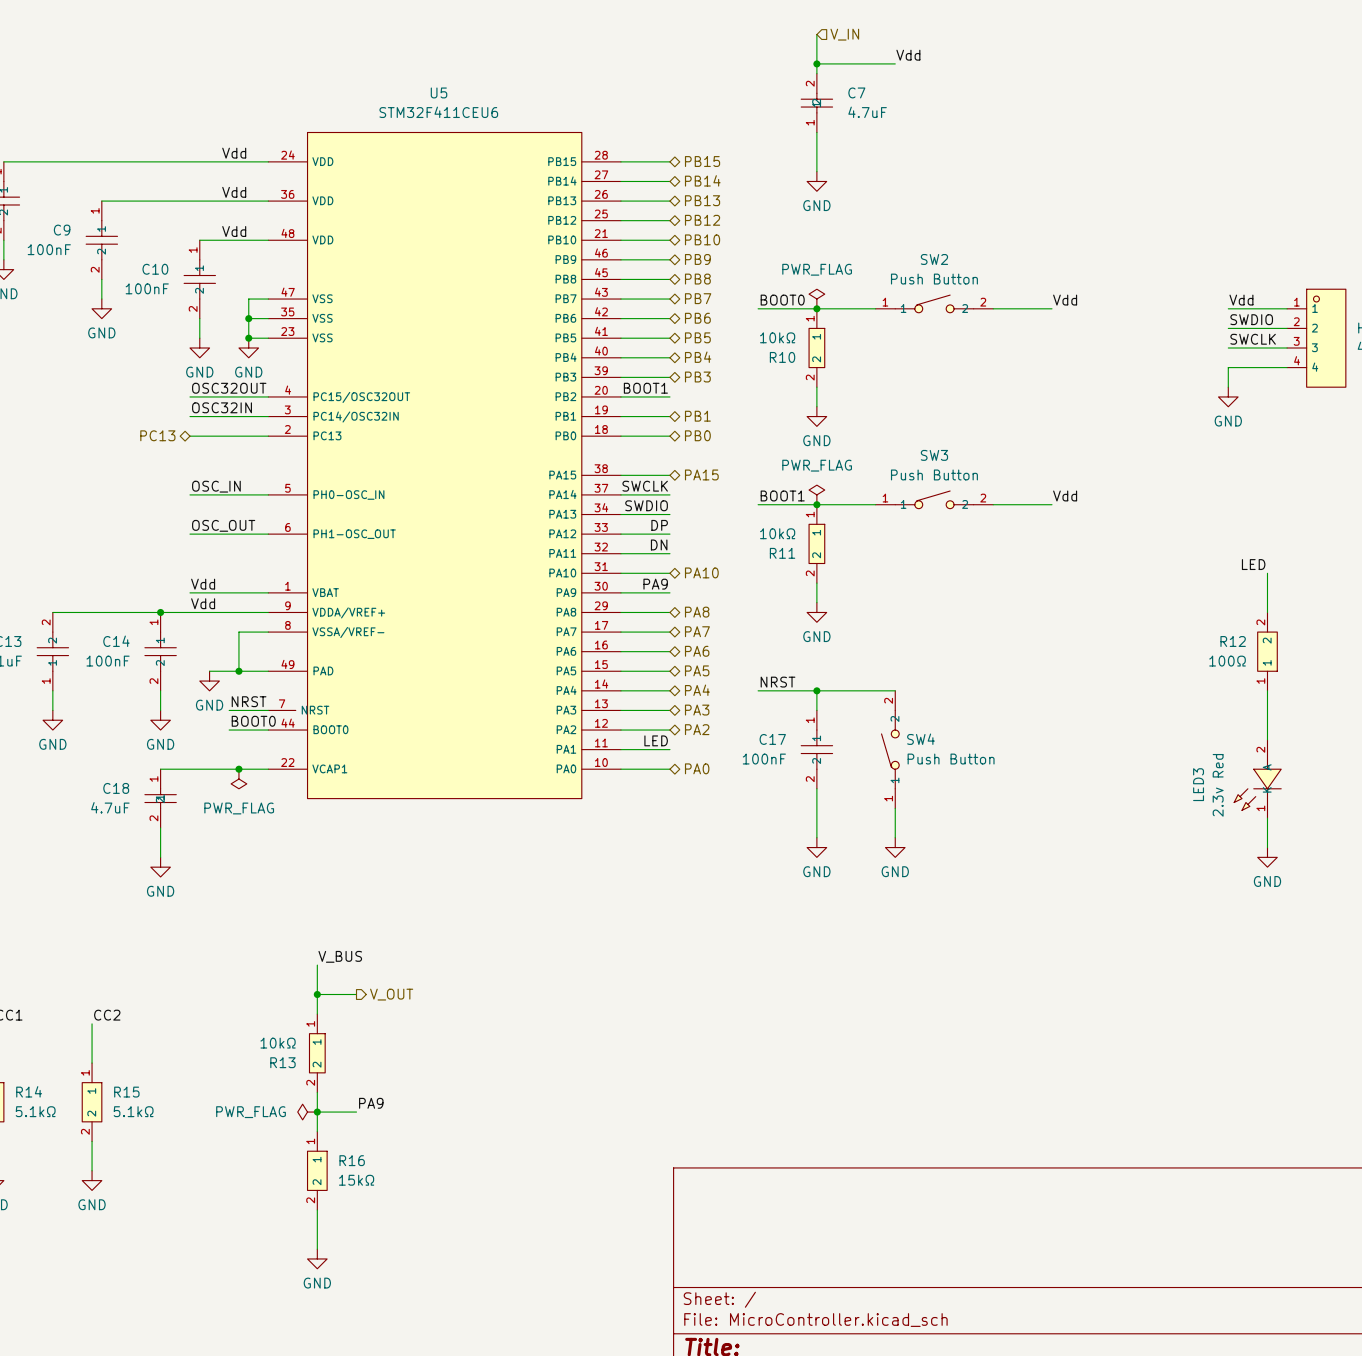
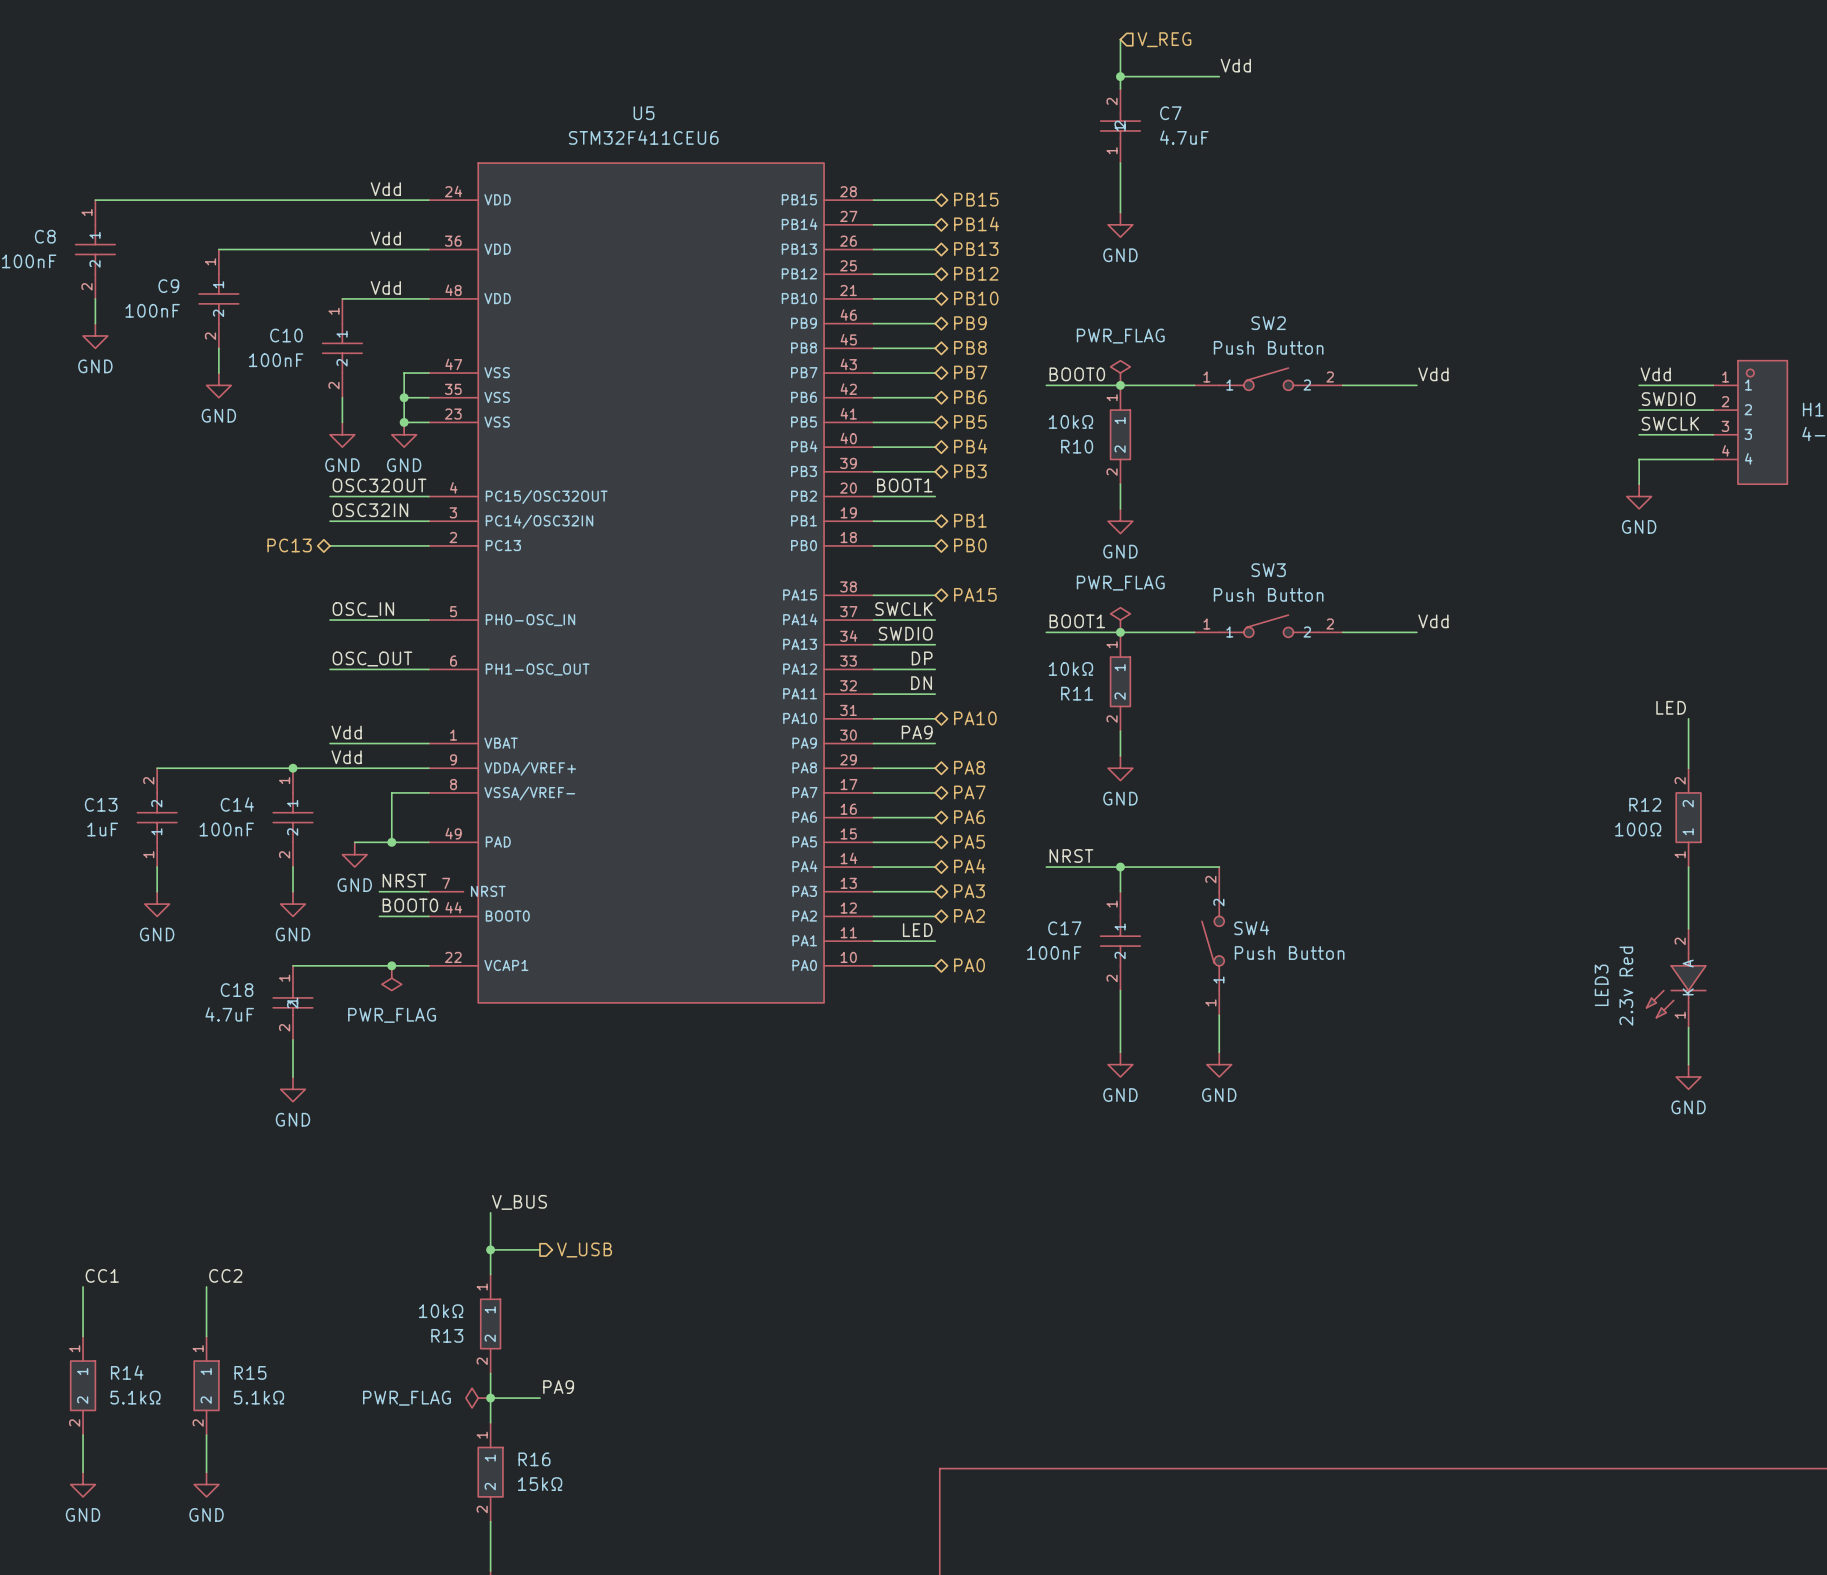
hierarchical label: V_IN (844, 34) -> V_REG (1164, 39)
hierarchical label: V_OUT (391, 994) -> V_USB (584, 1250)

